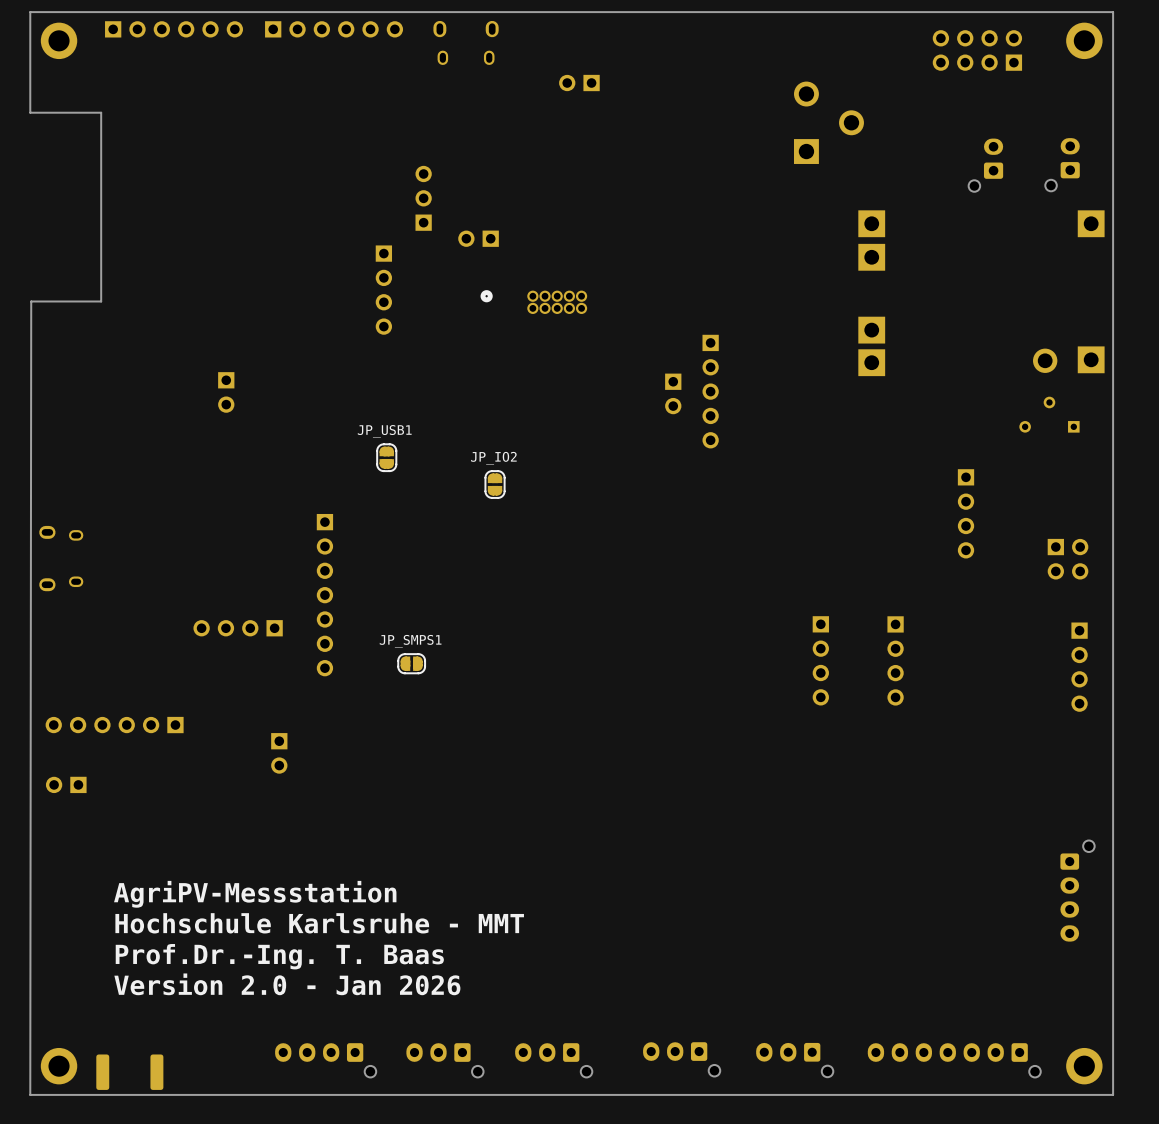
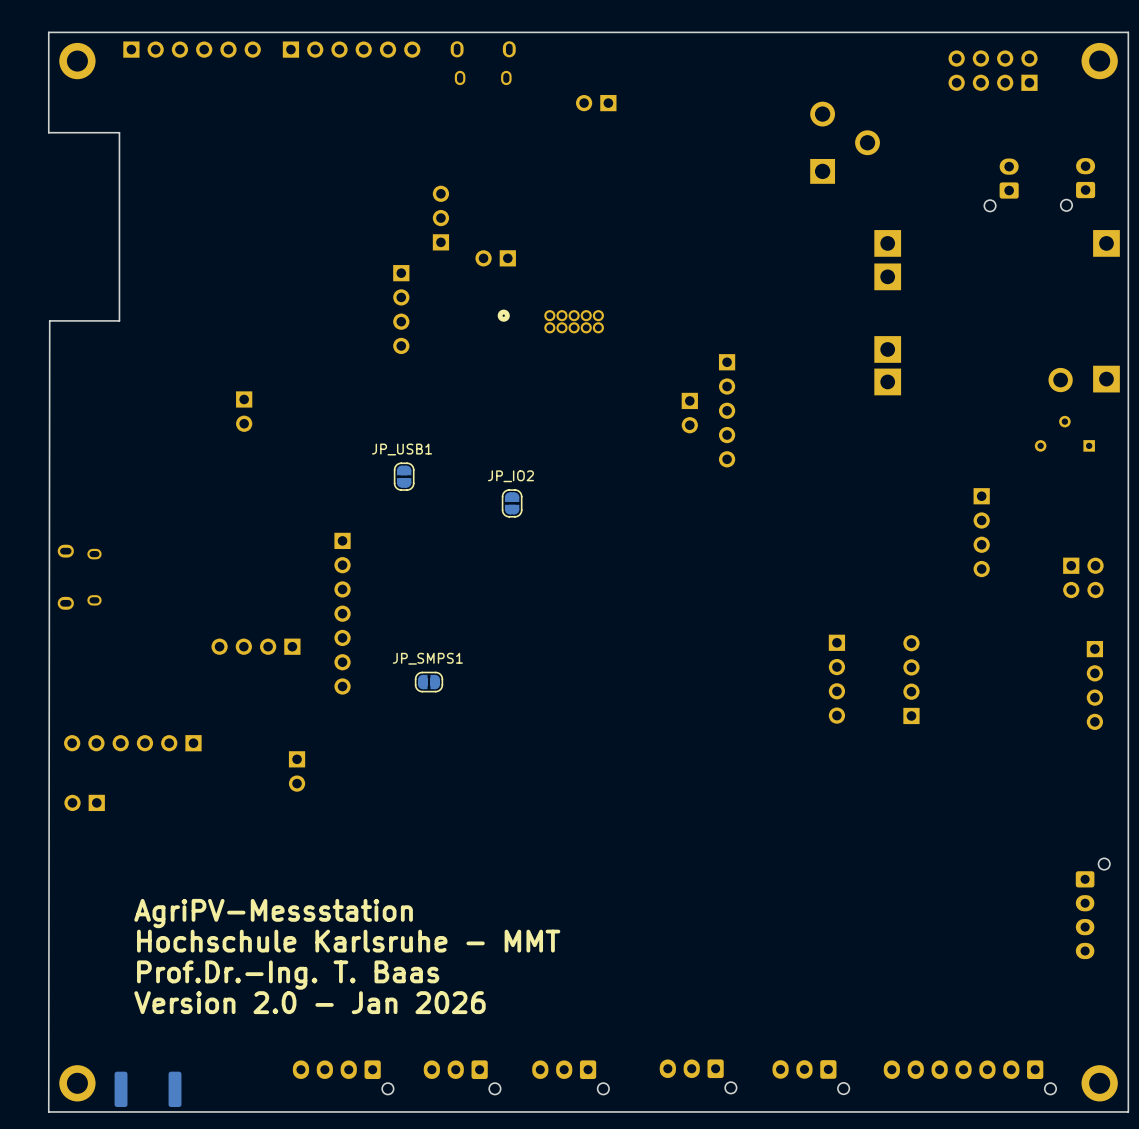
part rotation: 0° (895, 660) -> 180° (911, 679)

